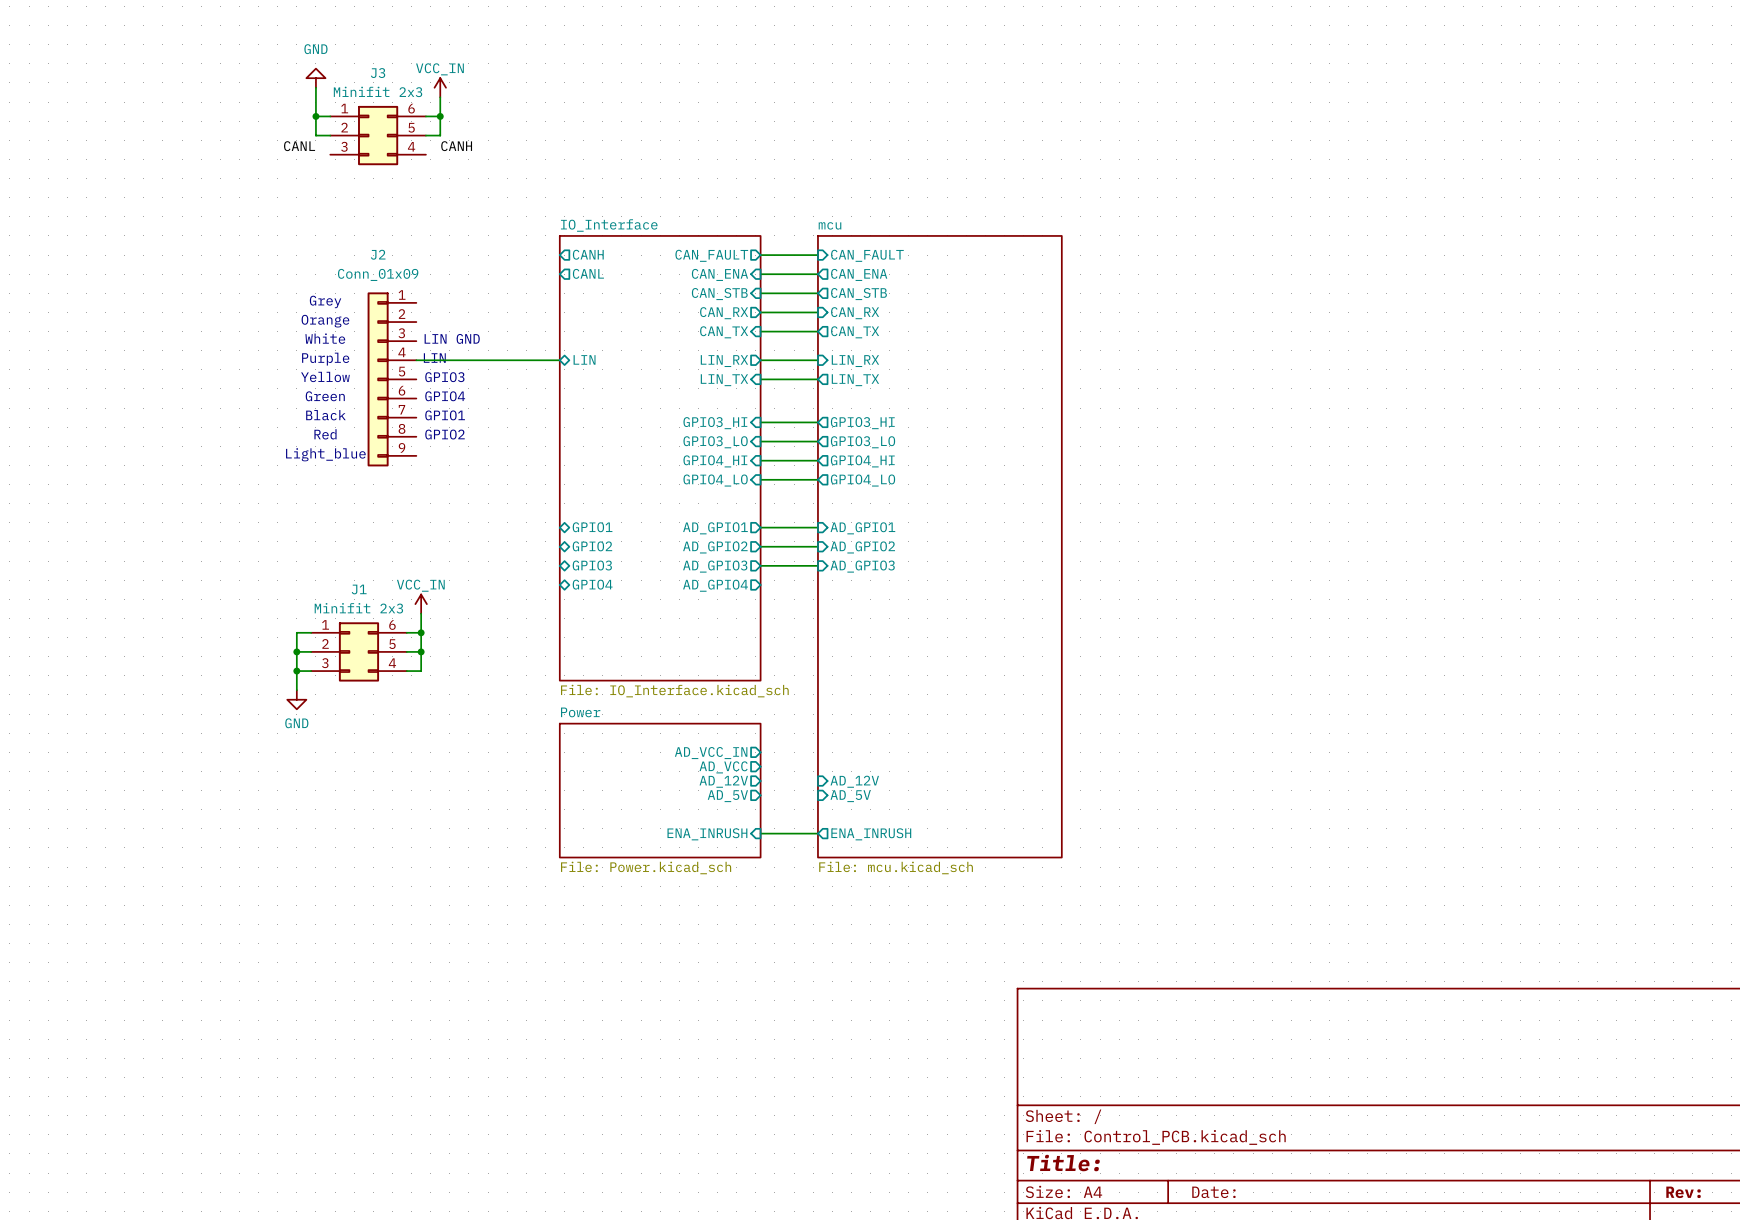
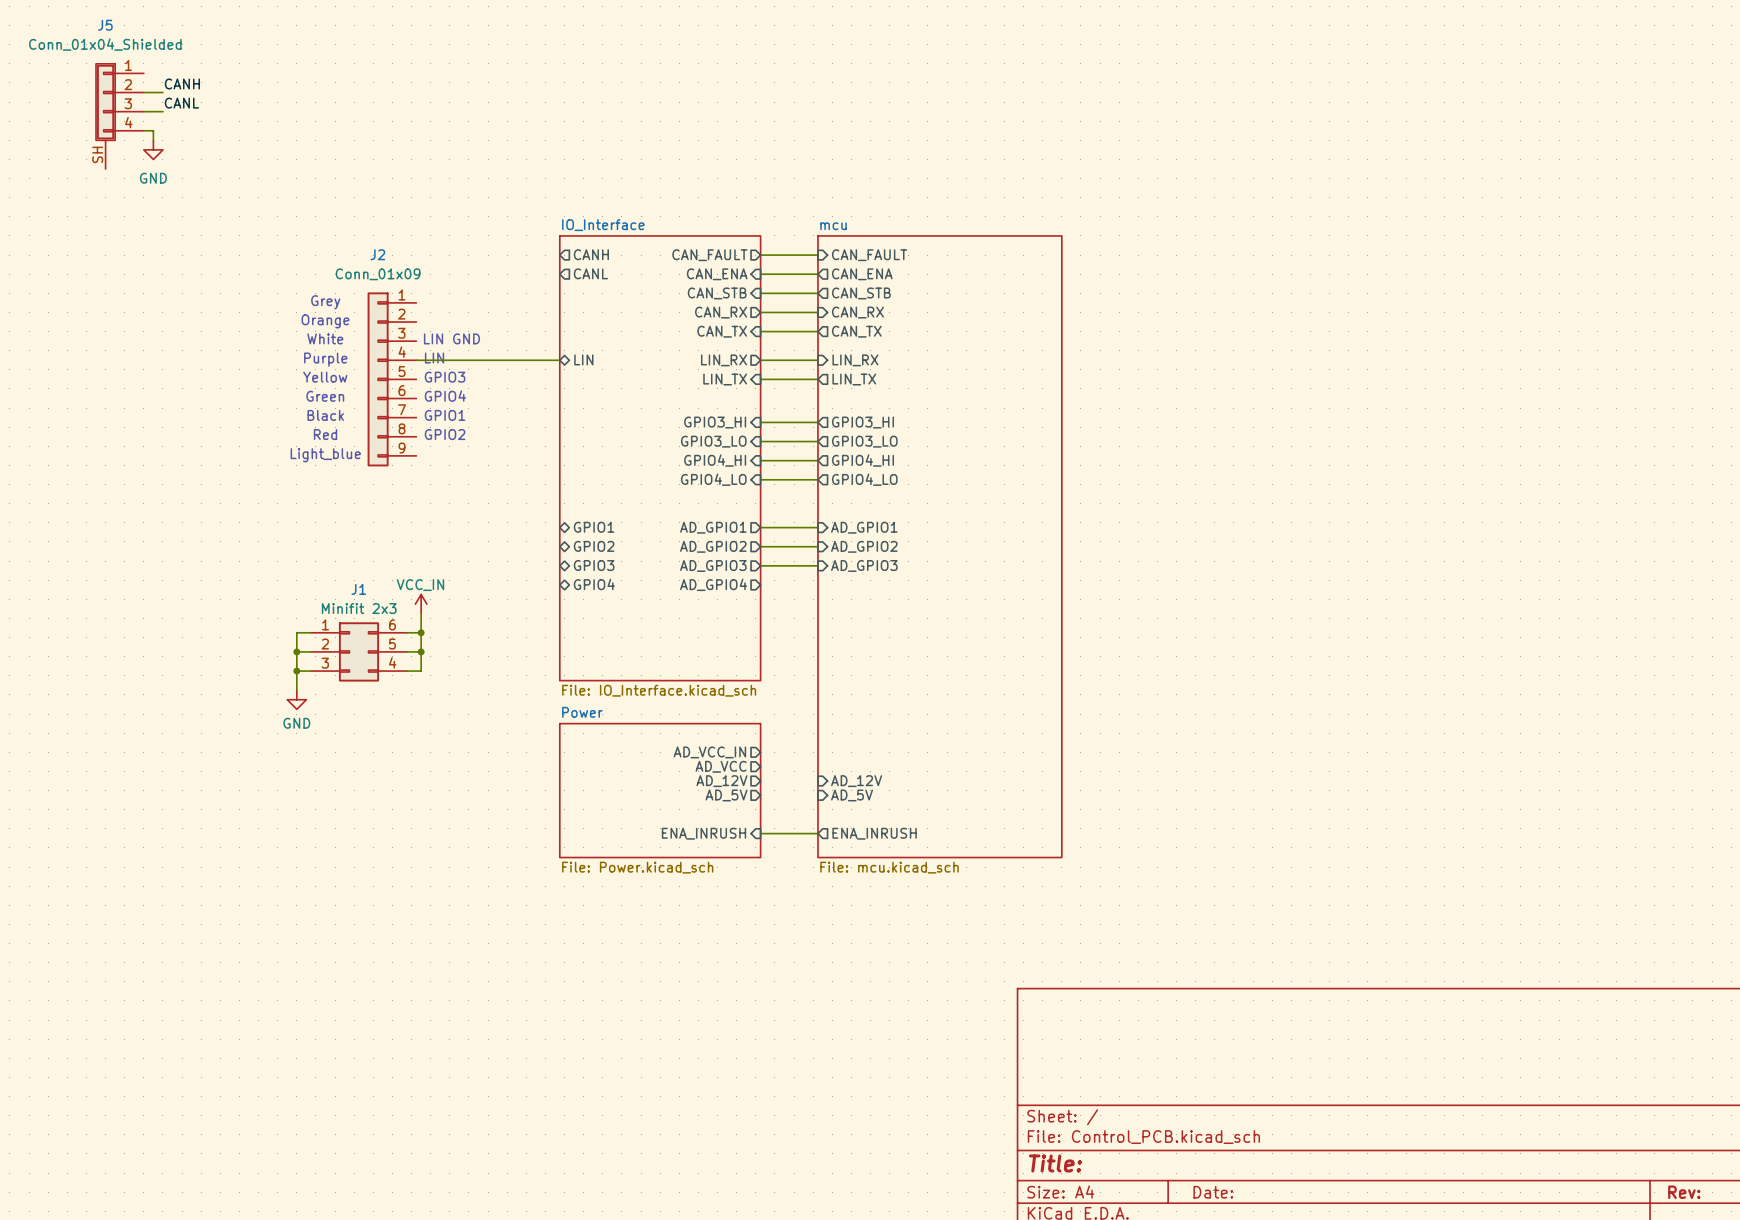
power symbol rotation: 0° (315, 78) -> 180° (153, 149)
power symbol position: GND (315, 78) -> GND (153, 149)
label: none -> CANH (182, 83)
wire: (315, 87) (315, 135) (330, 135) -> none
power symbol: VCC_IN (440, 87) -> none
wire: none -> (143, 92) (162, 92)
wire: (440, 97) (440, 135) (425, 135) -> none
wire: none -> (143, 111) (162, 111)
J5: none -> Conn_01x04_Shielded (119, 116)
wire: (315, 116) (330, 116) -> none
junction: (315, 116) -> none
wire: (425, 116) (440, 116) -> none
junction: (440, 116) -> none
wire: none -> (143, 130) (153, 130) (153, 140)
J3: Minifit 2x3 (378, 135) -> none
label position: CANL (299, 146) -> CANL (181, 103)
label: CANH (456, 146) -> none

